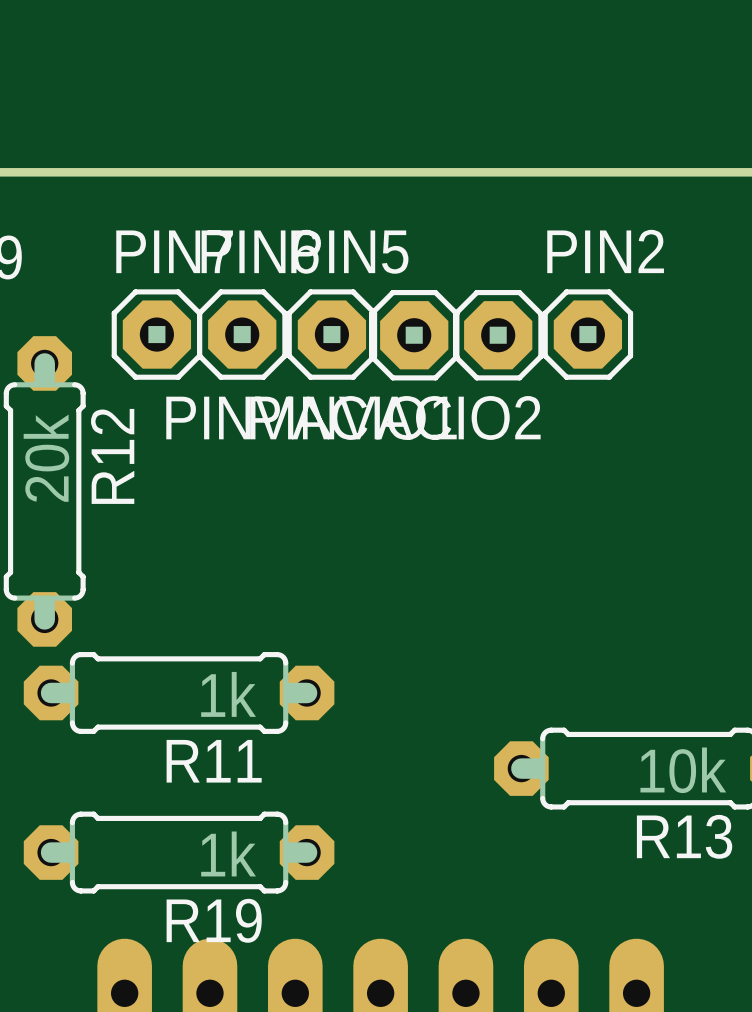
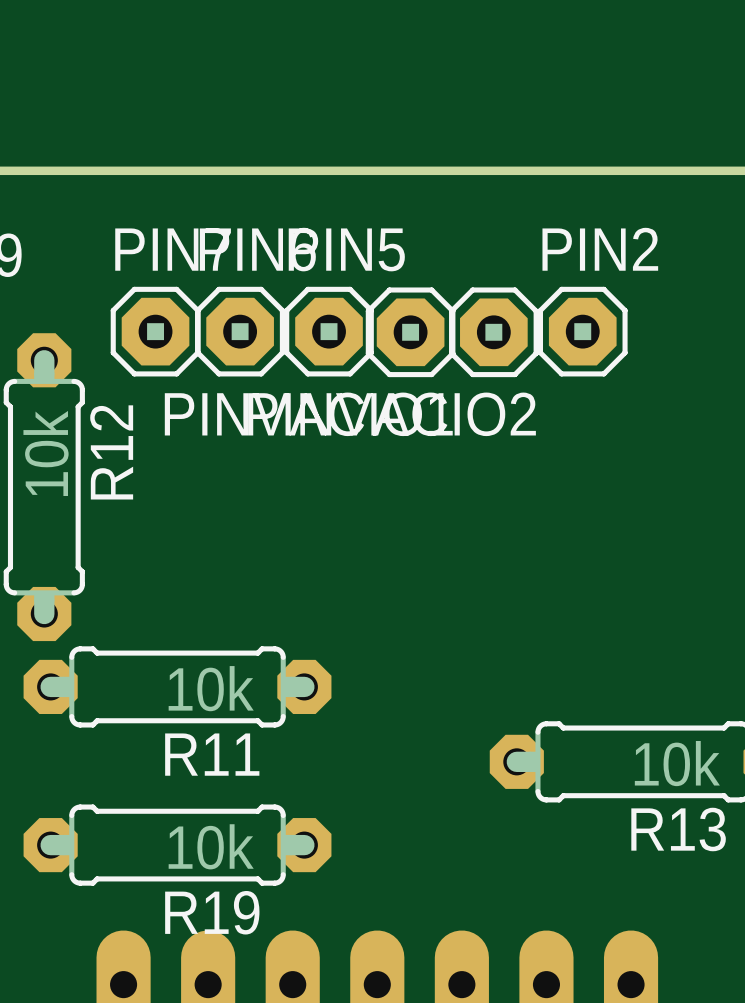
R12 value: 20k (46, 458) -> 10k (46, 453)
R11 value: 1k (228, 694) -> 10k (211, 688)
R19 value: 1k (228, 853) -> 10k (211, 846)

